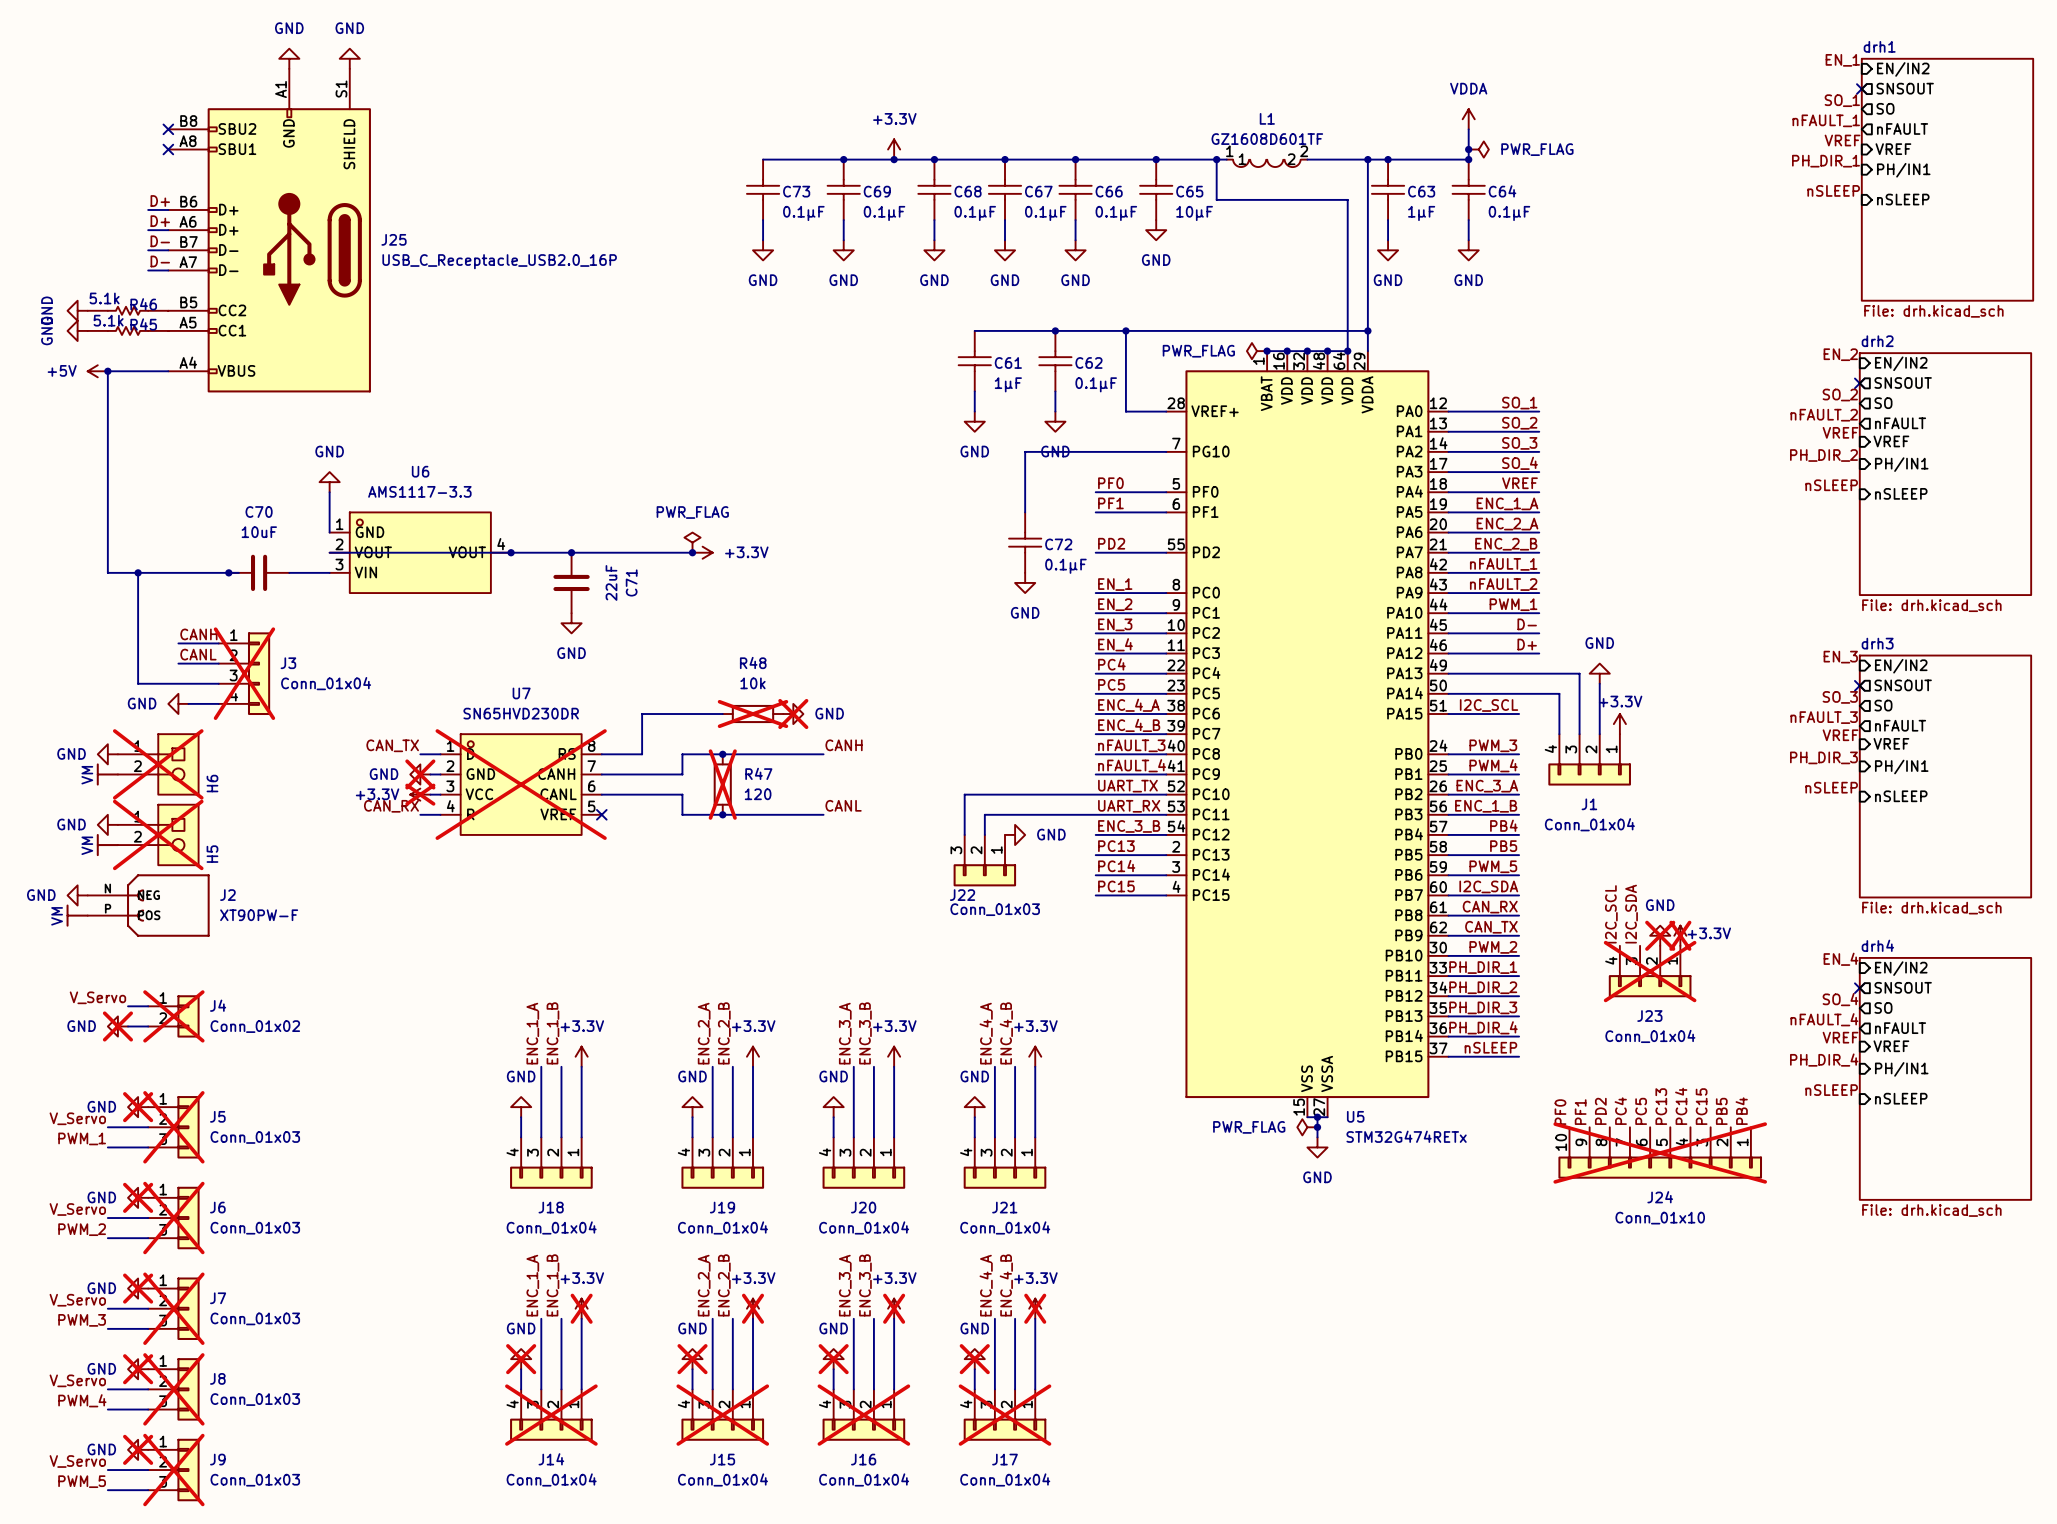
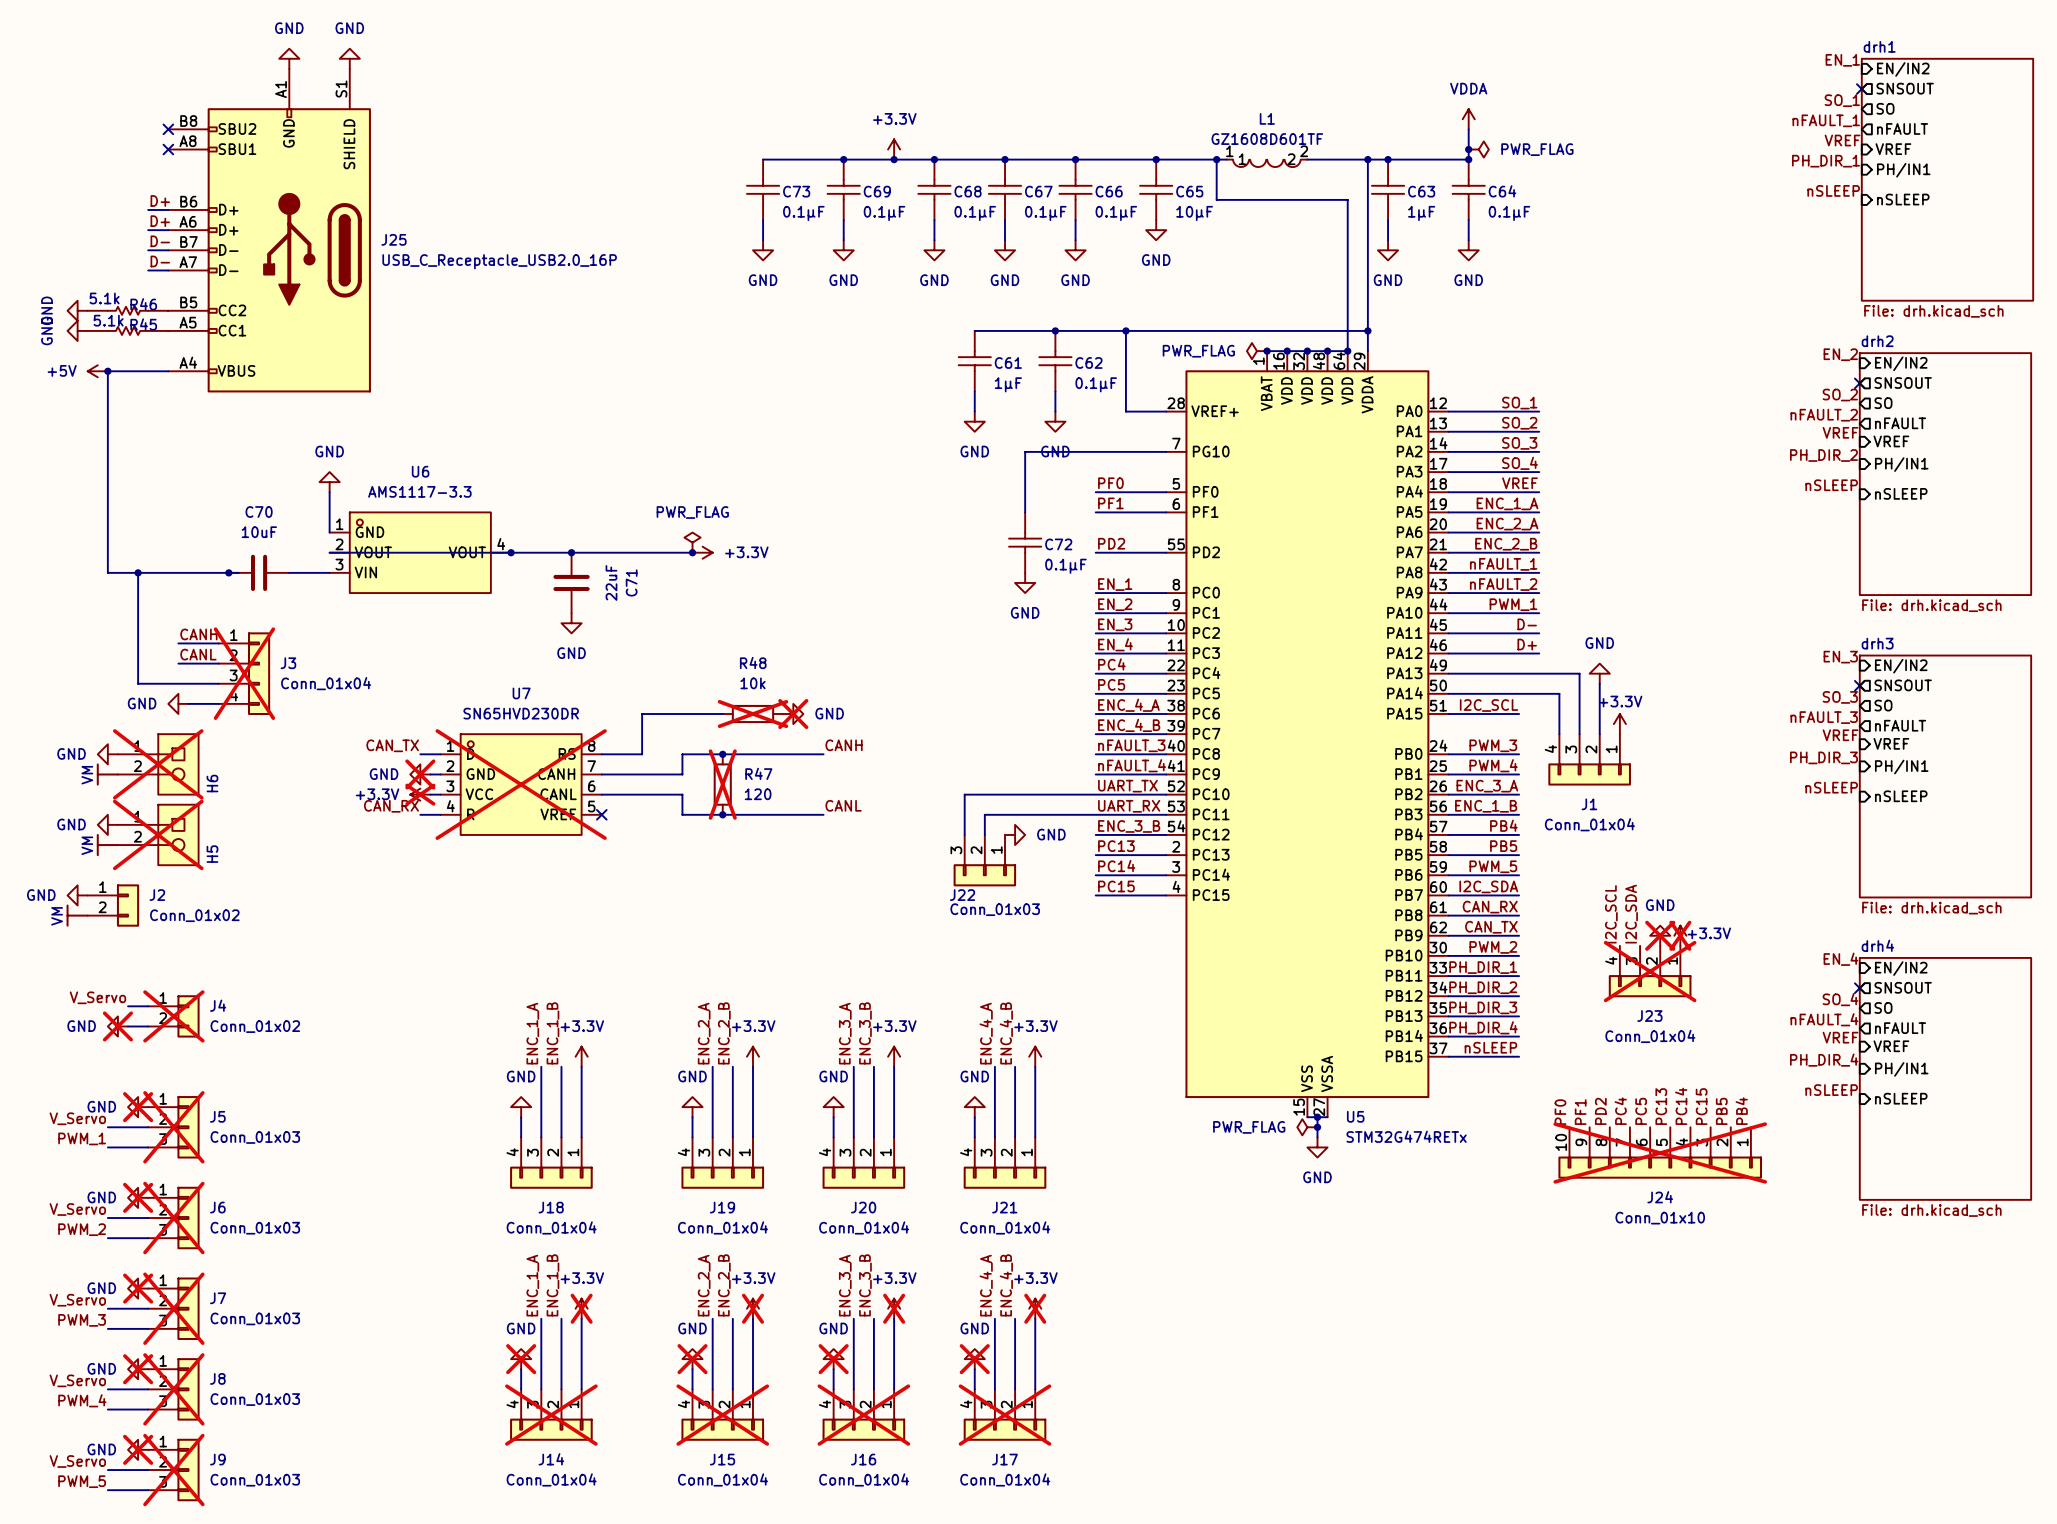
J2 symbol: [87, 874, 210, 937] -> [87, 884, 140, 927]
J2 name position: J2 (227, 895) -> J2 (157, 895)
J2 value: XT90PW-F (259, 915) -> Conn_01x02 (194, 915)

